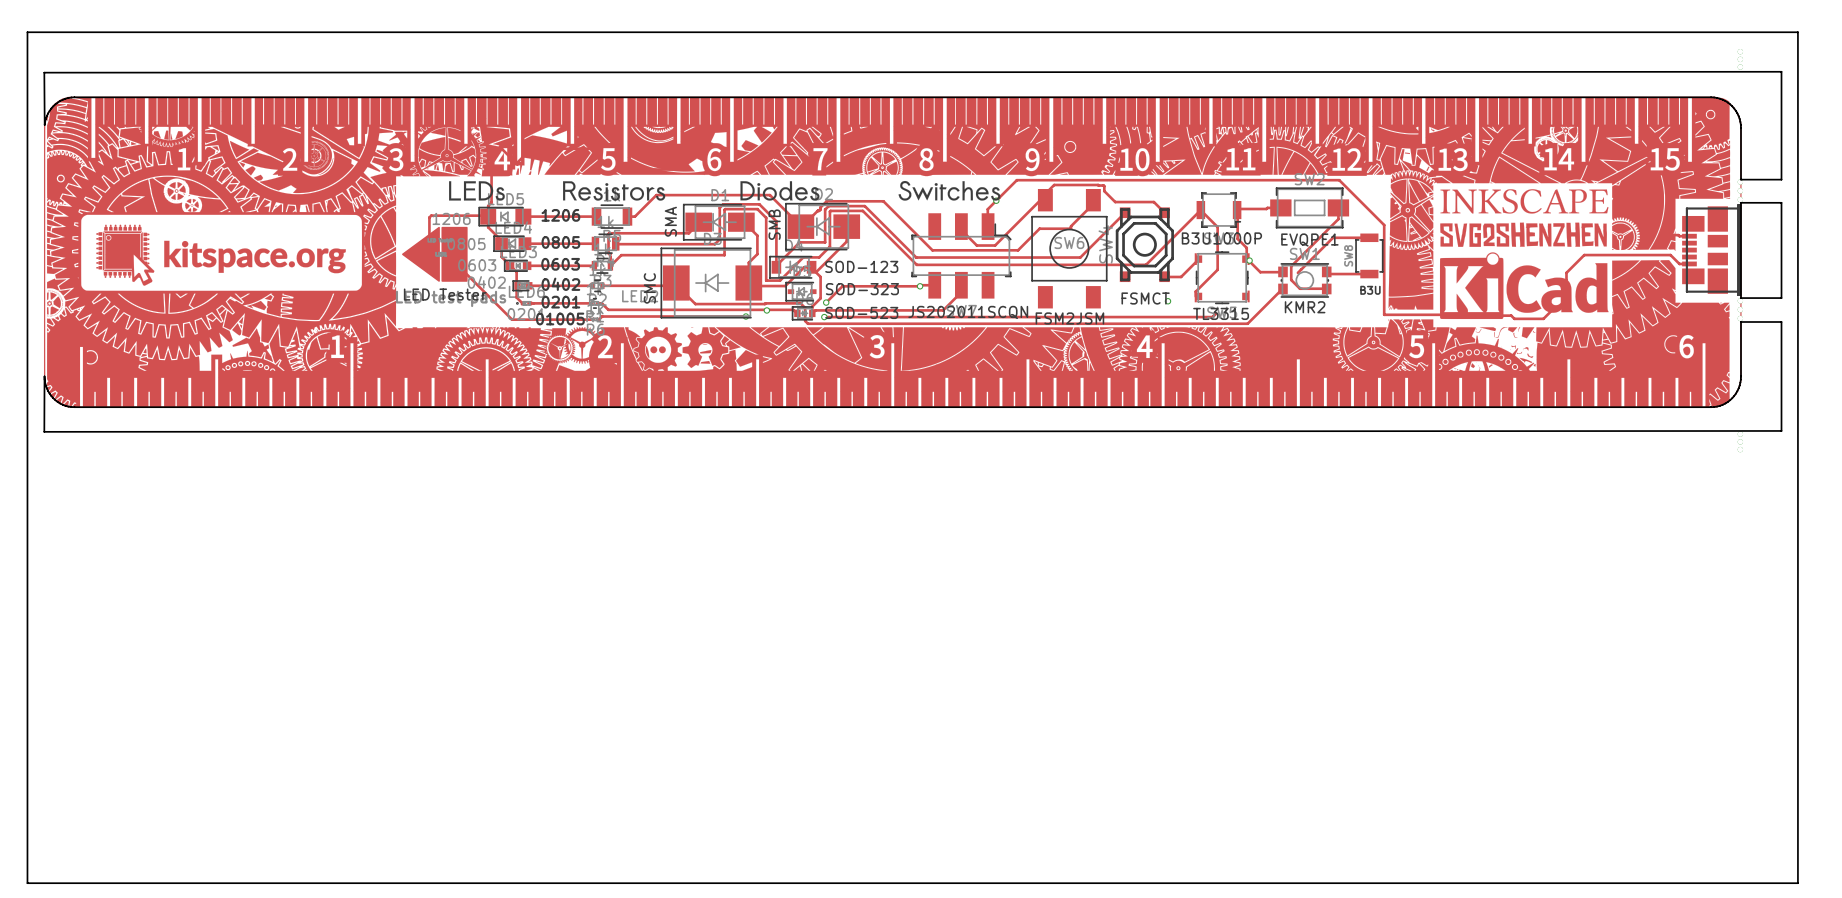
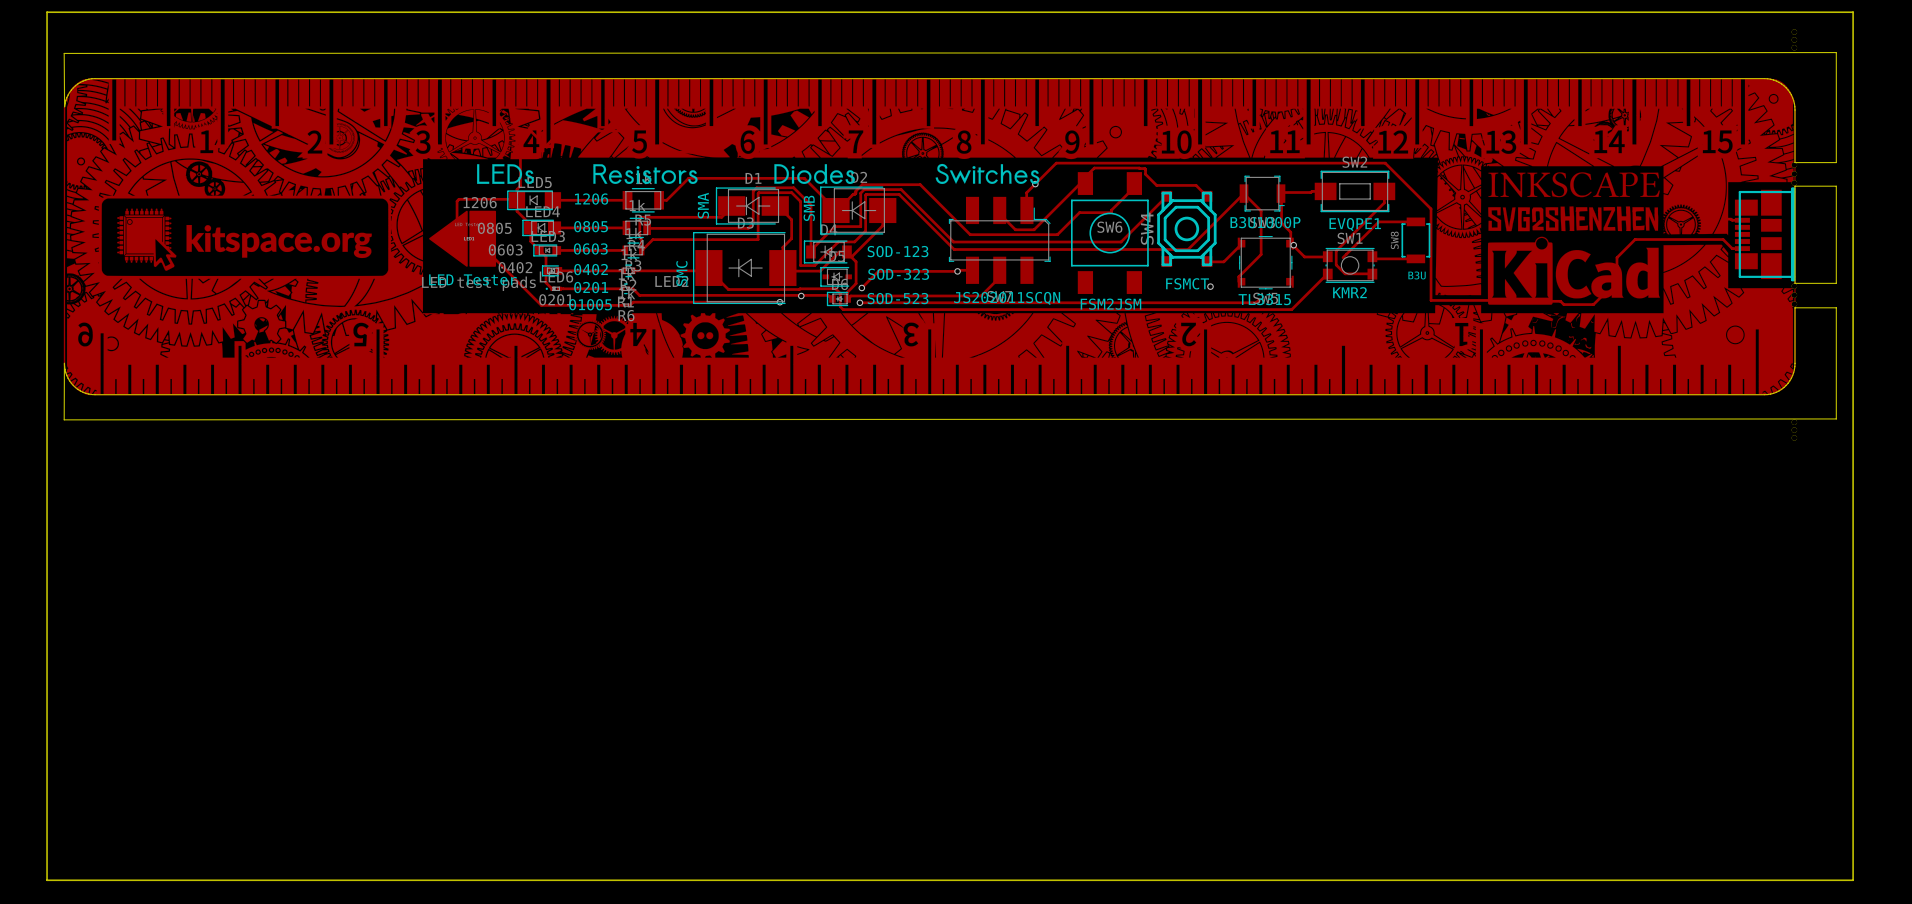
part footprint: [43, 49, 1783, 453] -> [63, 29, 1837, 441]

